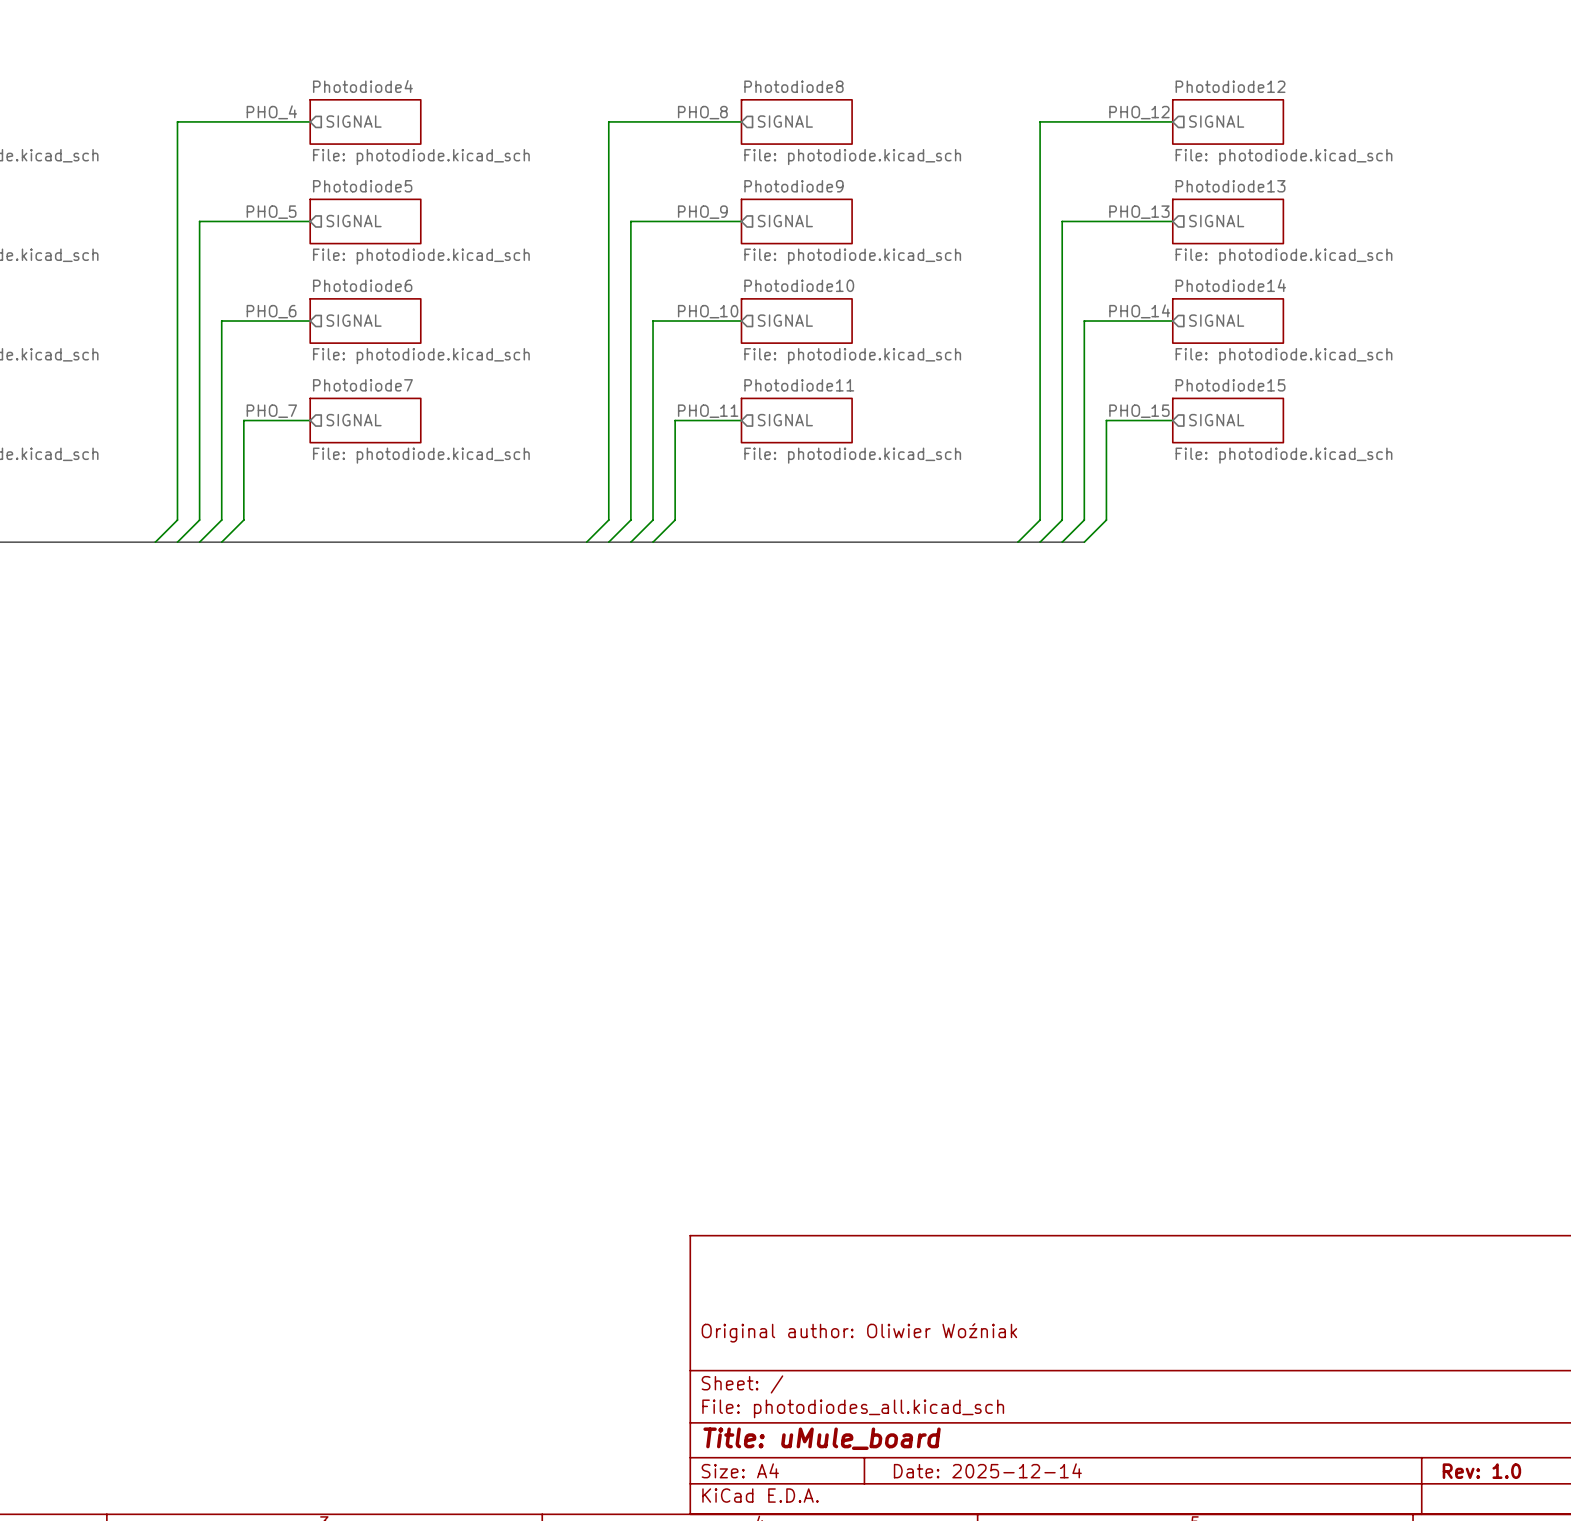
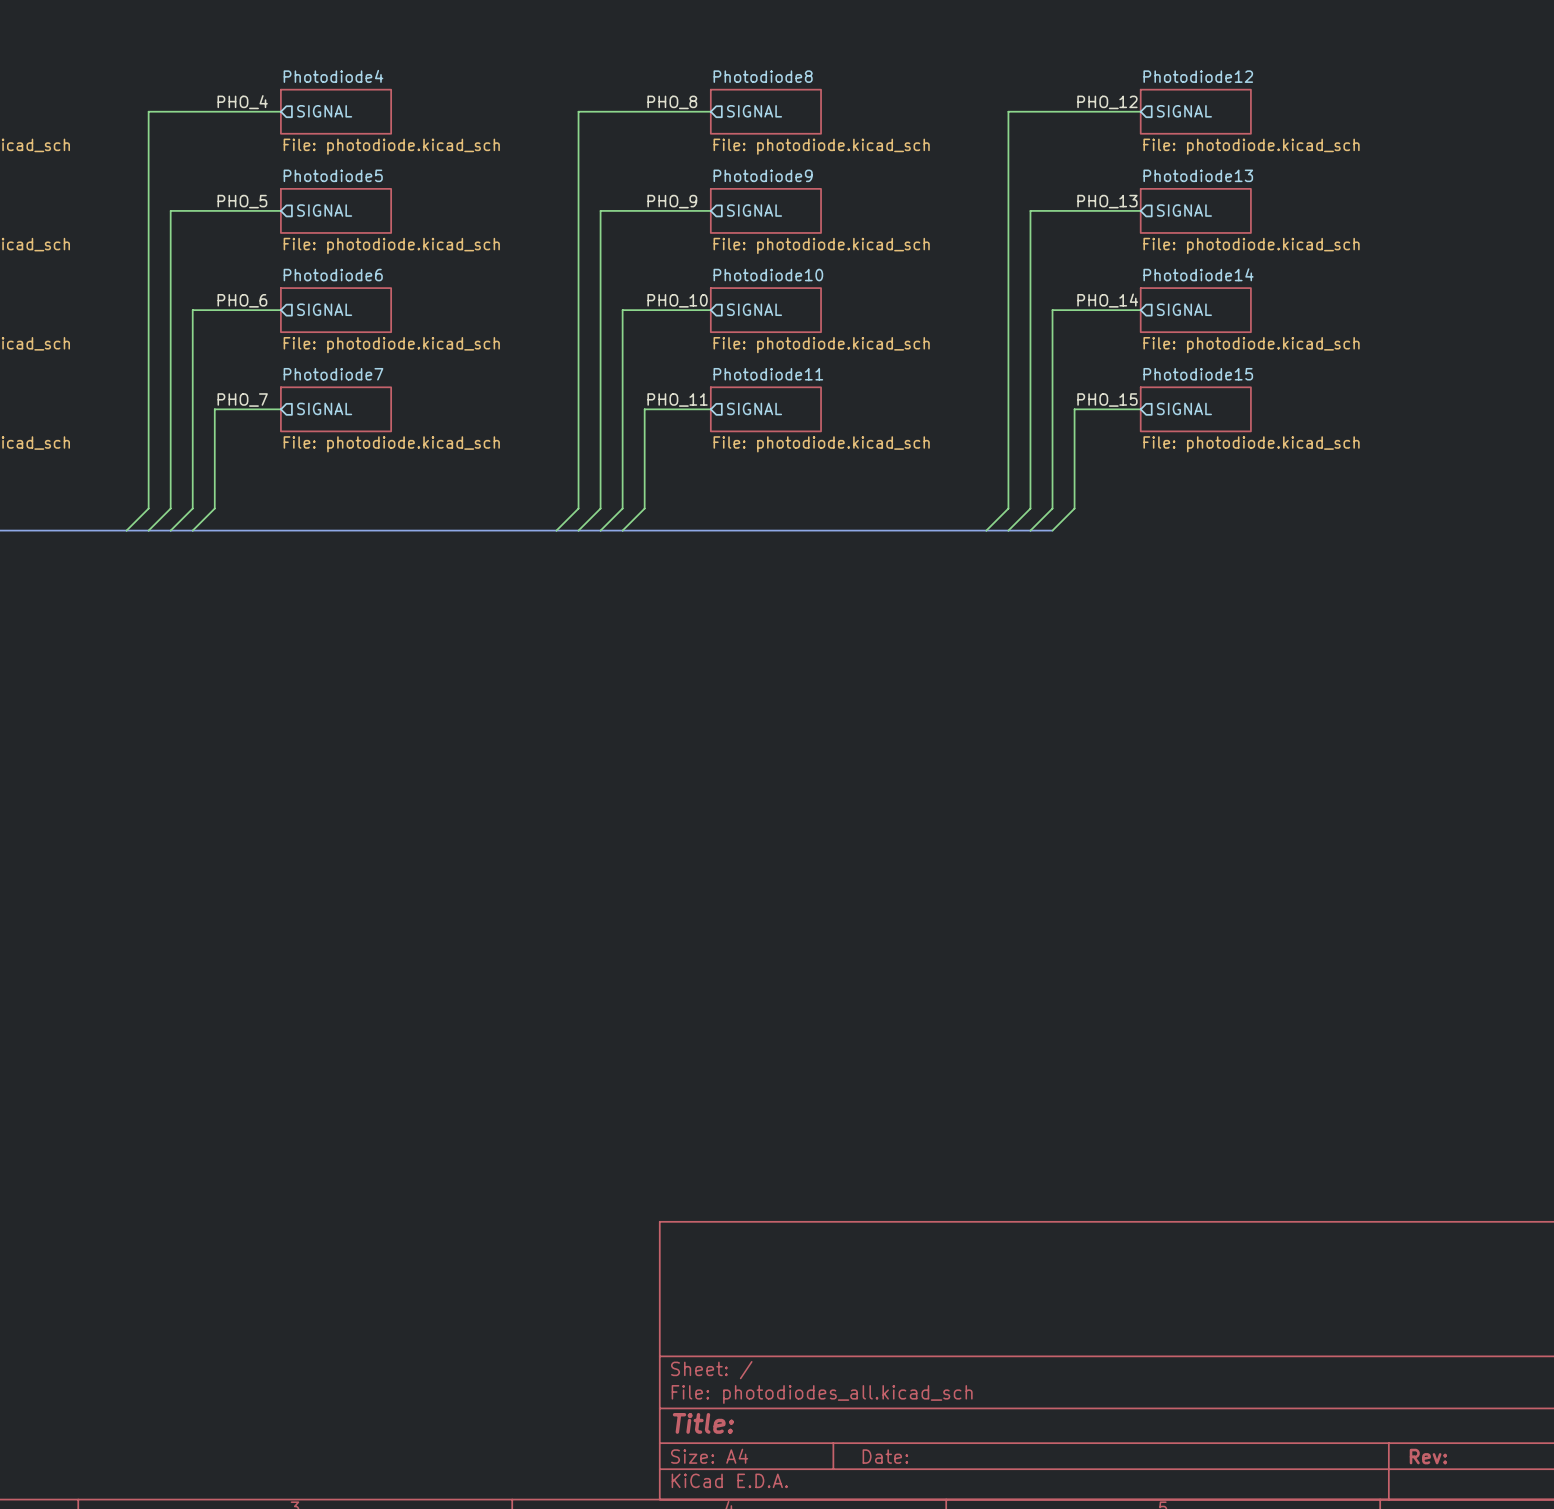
title block: Original author: Oliwier Woźniak (859, 1332) -> none
title block: Title: uMule_board (822, 1438) -> Title: (703, 1423)
title block: Date: 2025-12-14 (987, 1470) -> Date: (885, 1456)
title block: Rev: 1.0 (1481, 1471) -> Rev: (1428, 1456)

